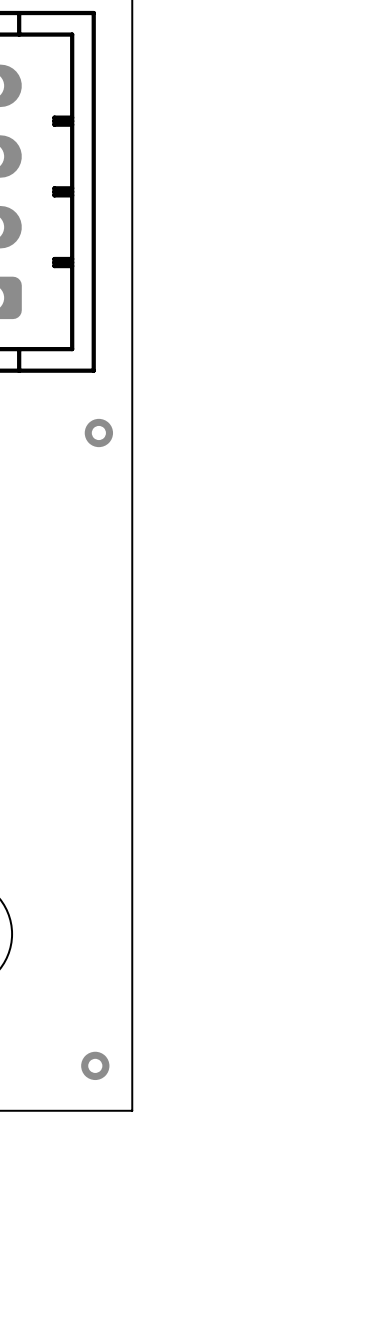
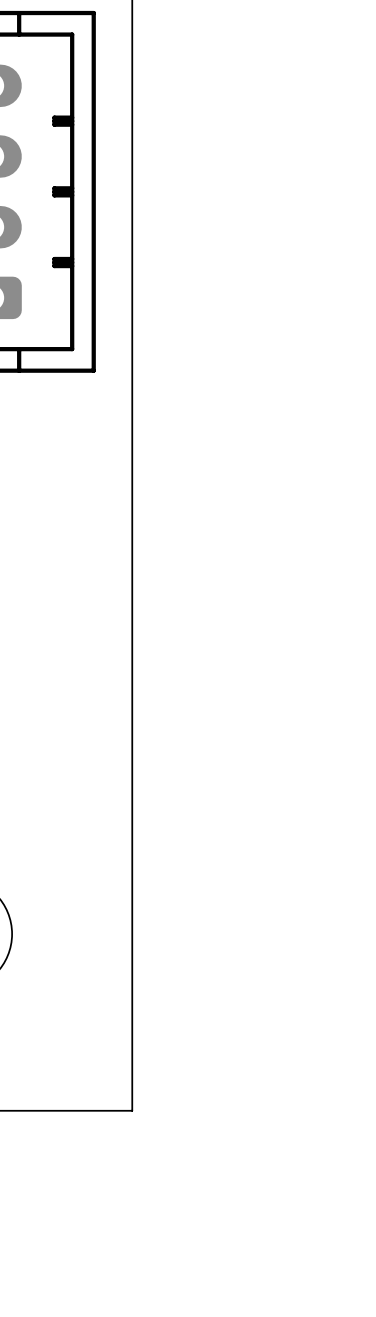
via: (98, 433) -> none
via: (95, 1065) -> none

